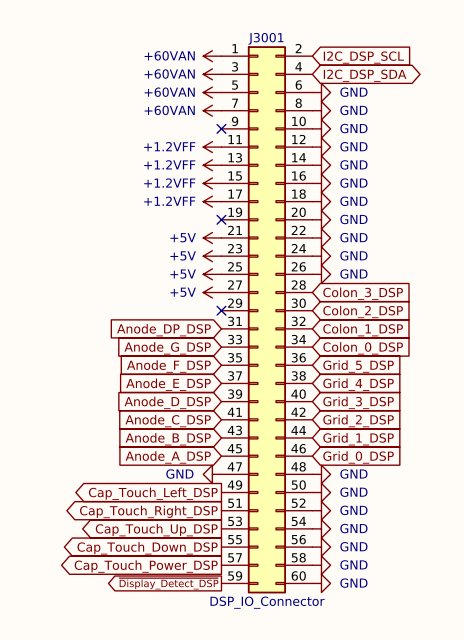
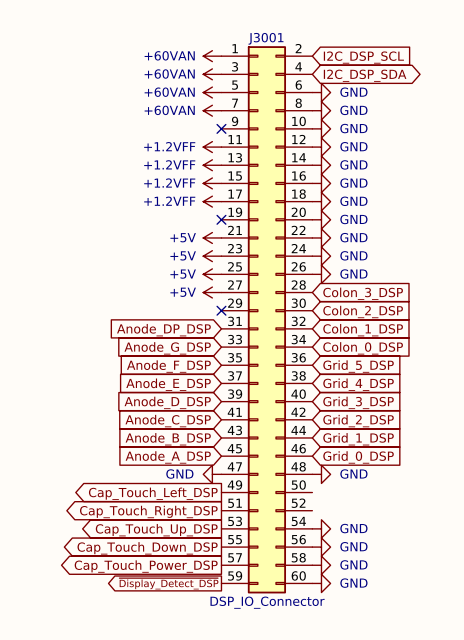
power symbol: GND (321, 492) -> none
power symbol: GND (321, 510) -> none

